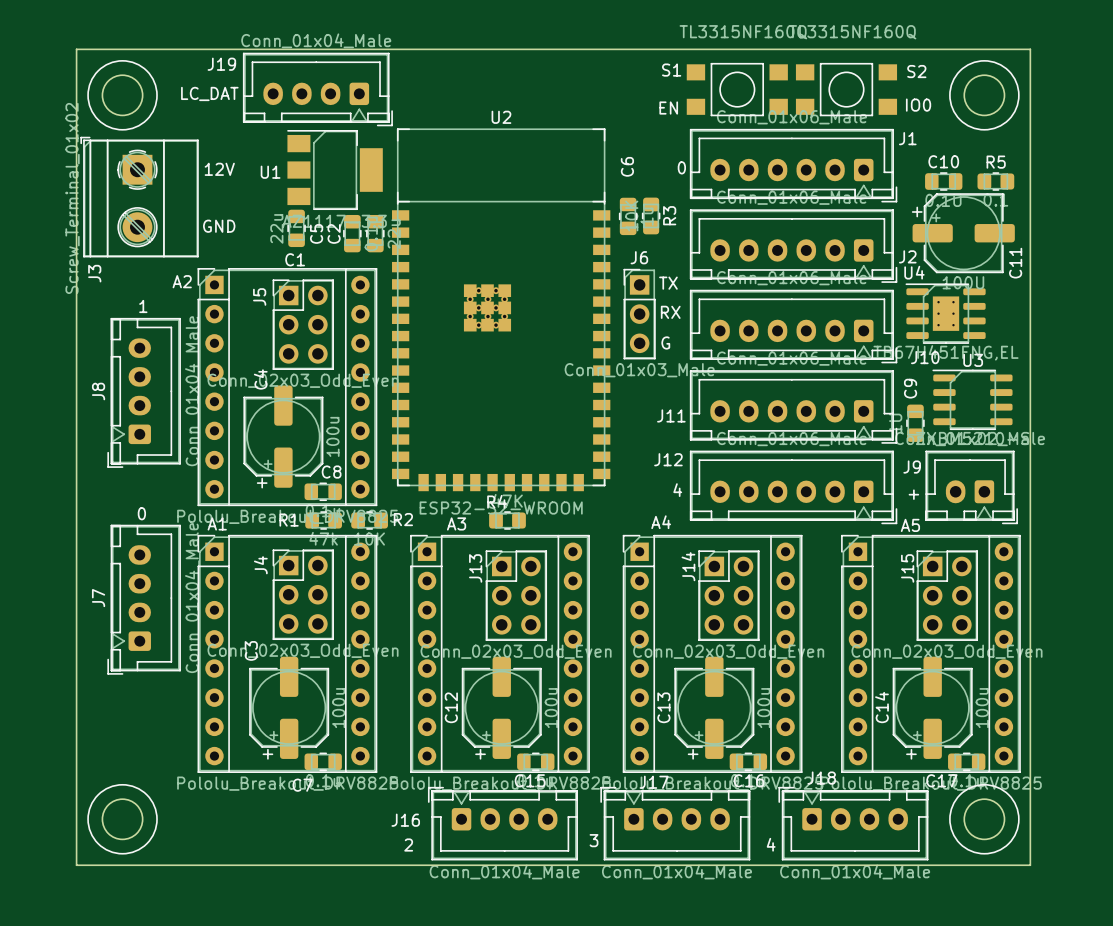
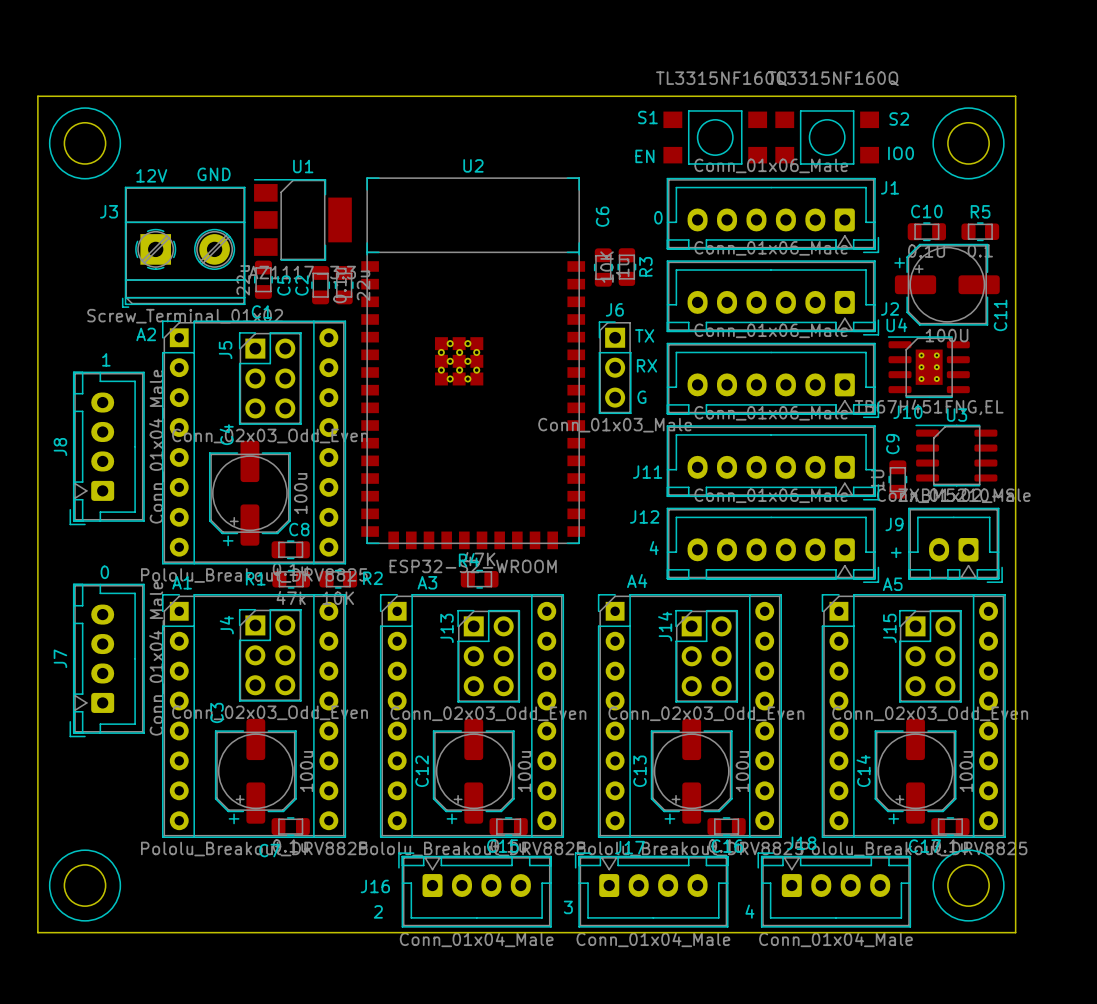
J19: Conn_01x04_Male (317, 89) -> none
text: LC_DAT (209, 93) -> none
text position: 12V (219, 169) -> 12V (151, 175)
U1 name position: U1 (270, 172) -> U1 (303, 166)
J3 rotation: 0° (139, 197) -> 90° counterclockwise (183, 247)
J3 position: (139, 197) -> (183, 247)
text position: GND (219, 226) -> GND (214, 174)
J3 name position: J3 (94, 273) -> J3 (109, 211)

